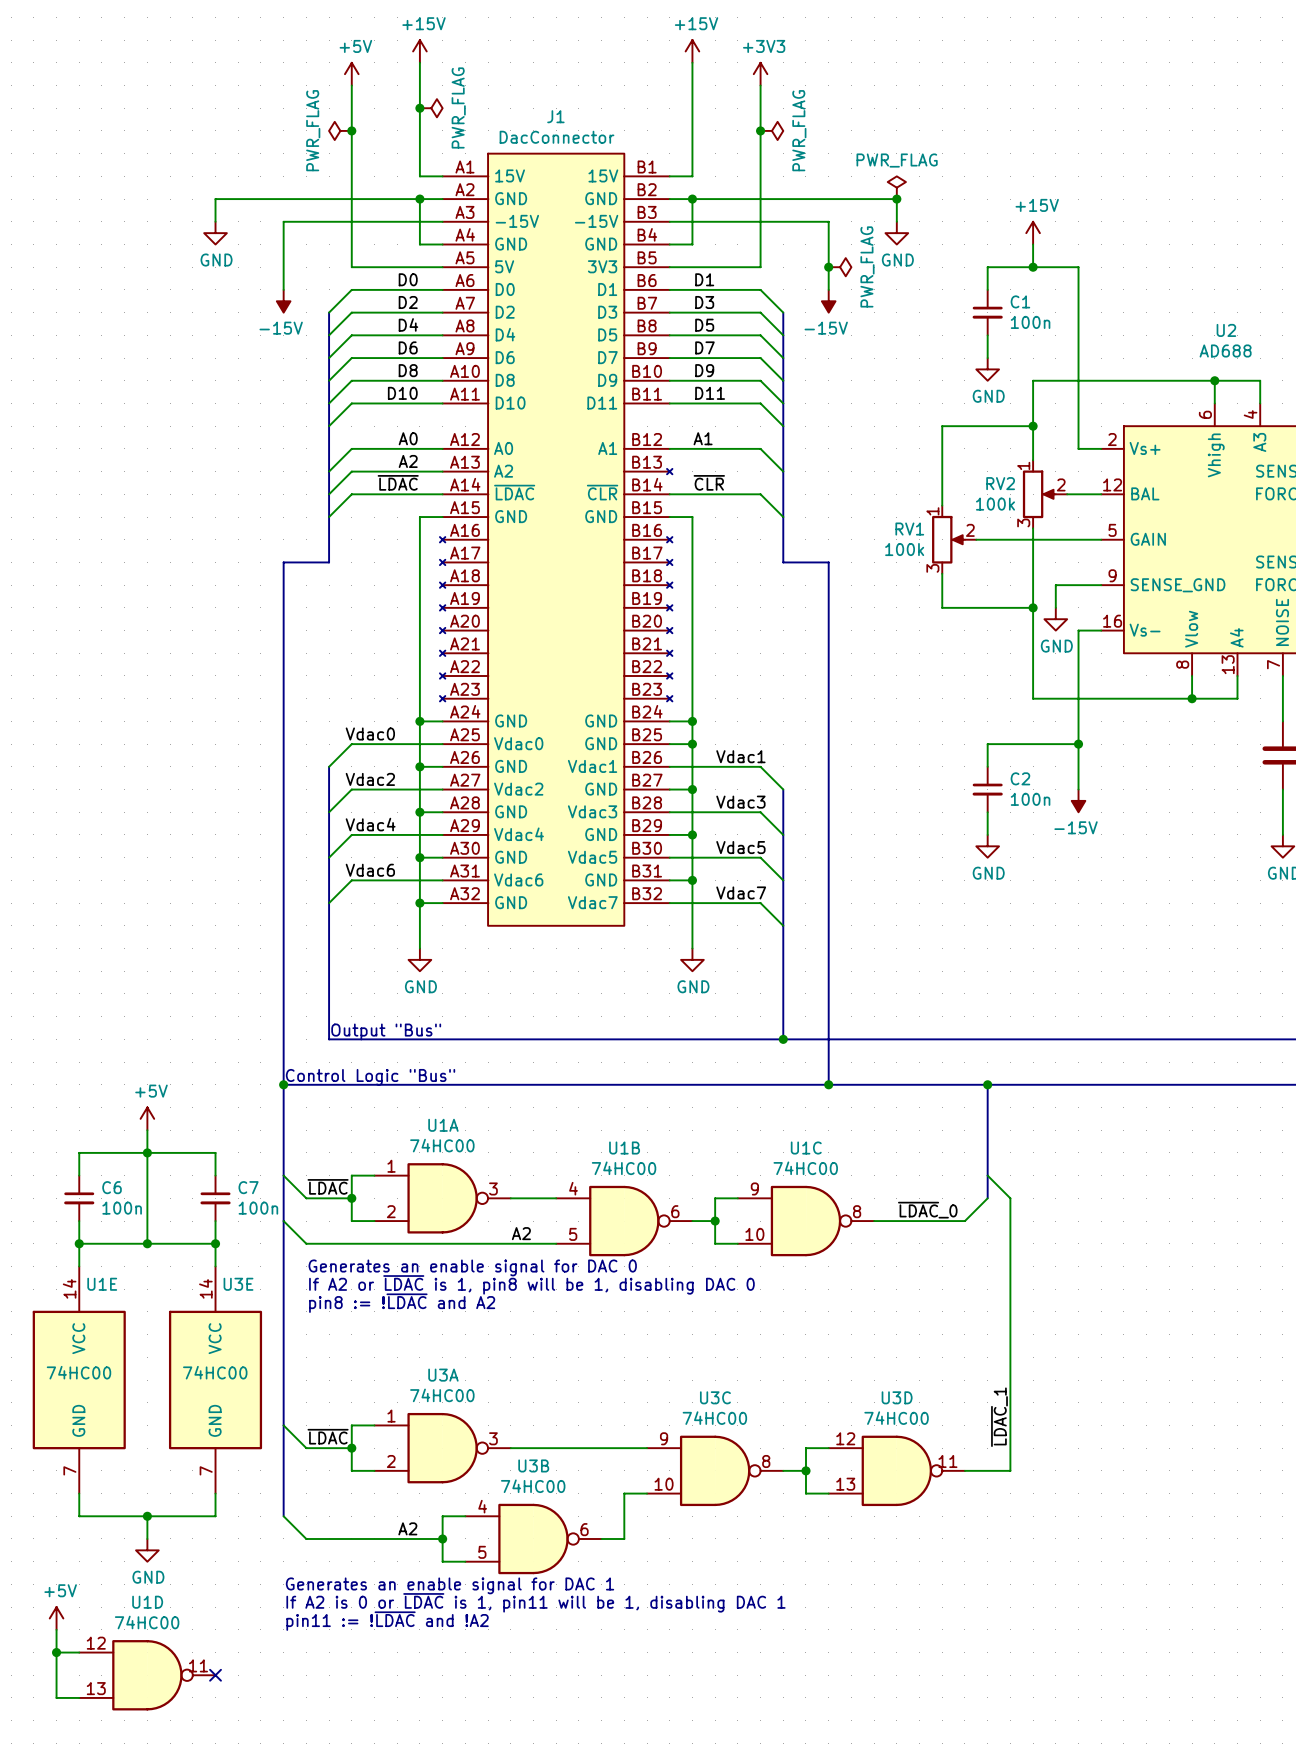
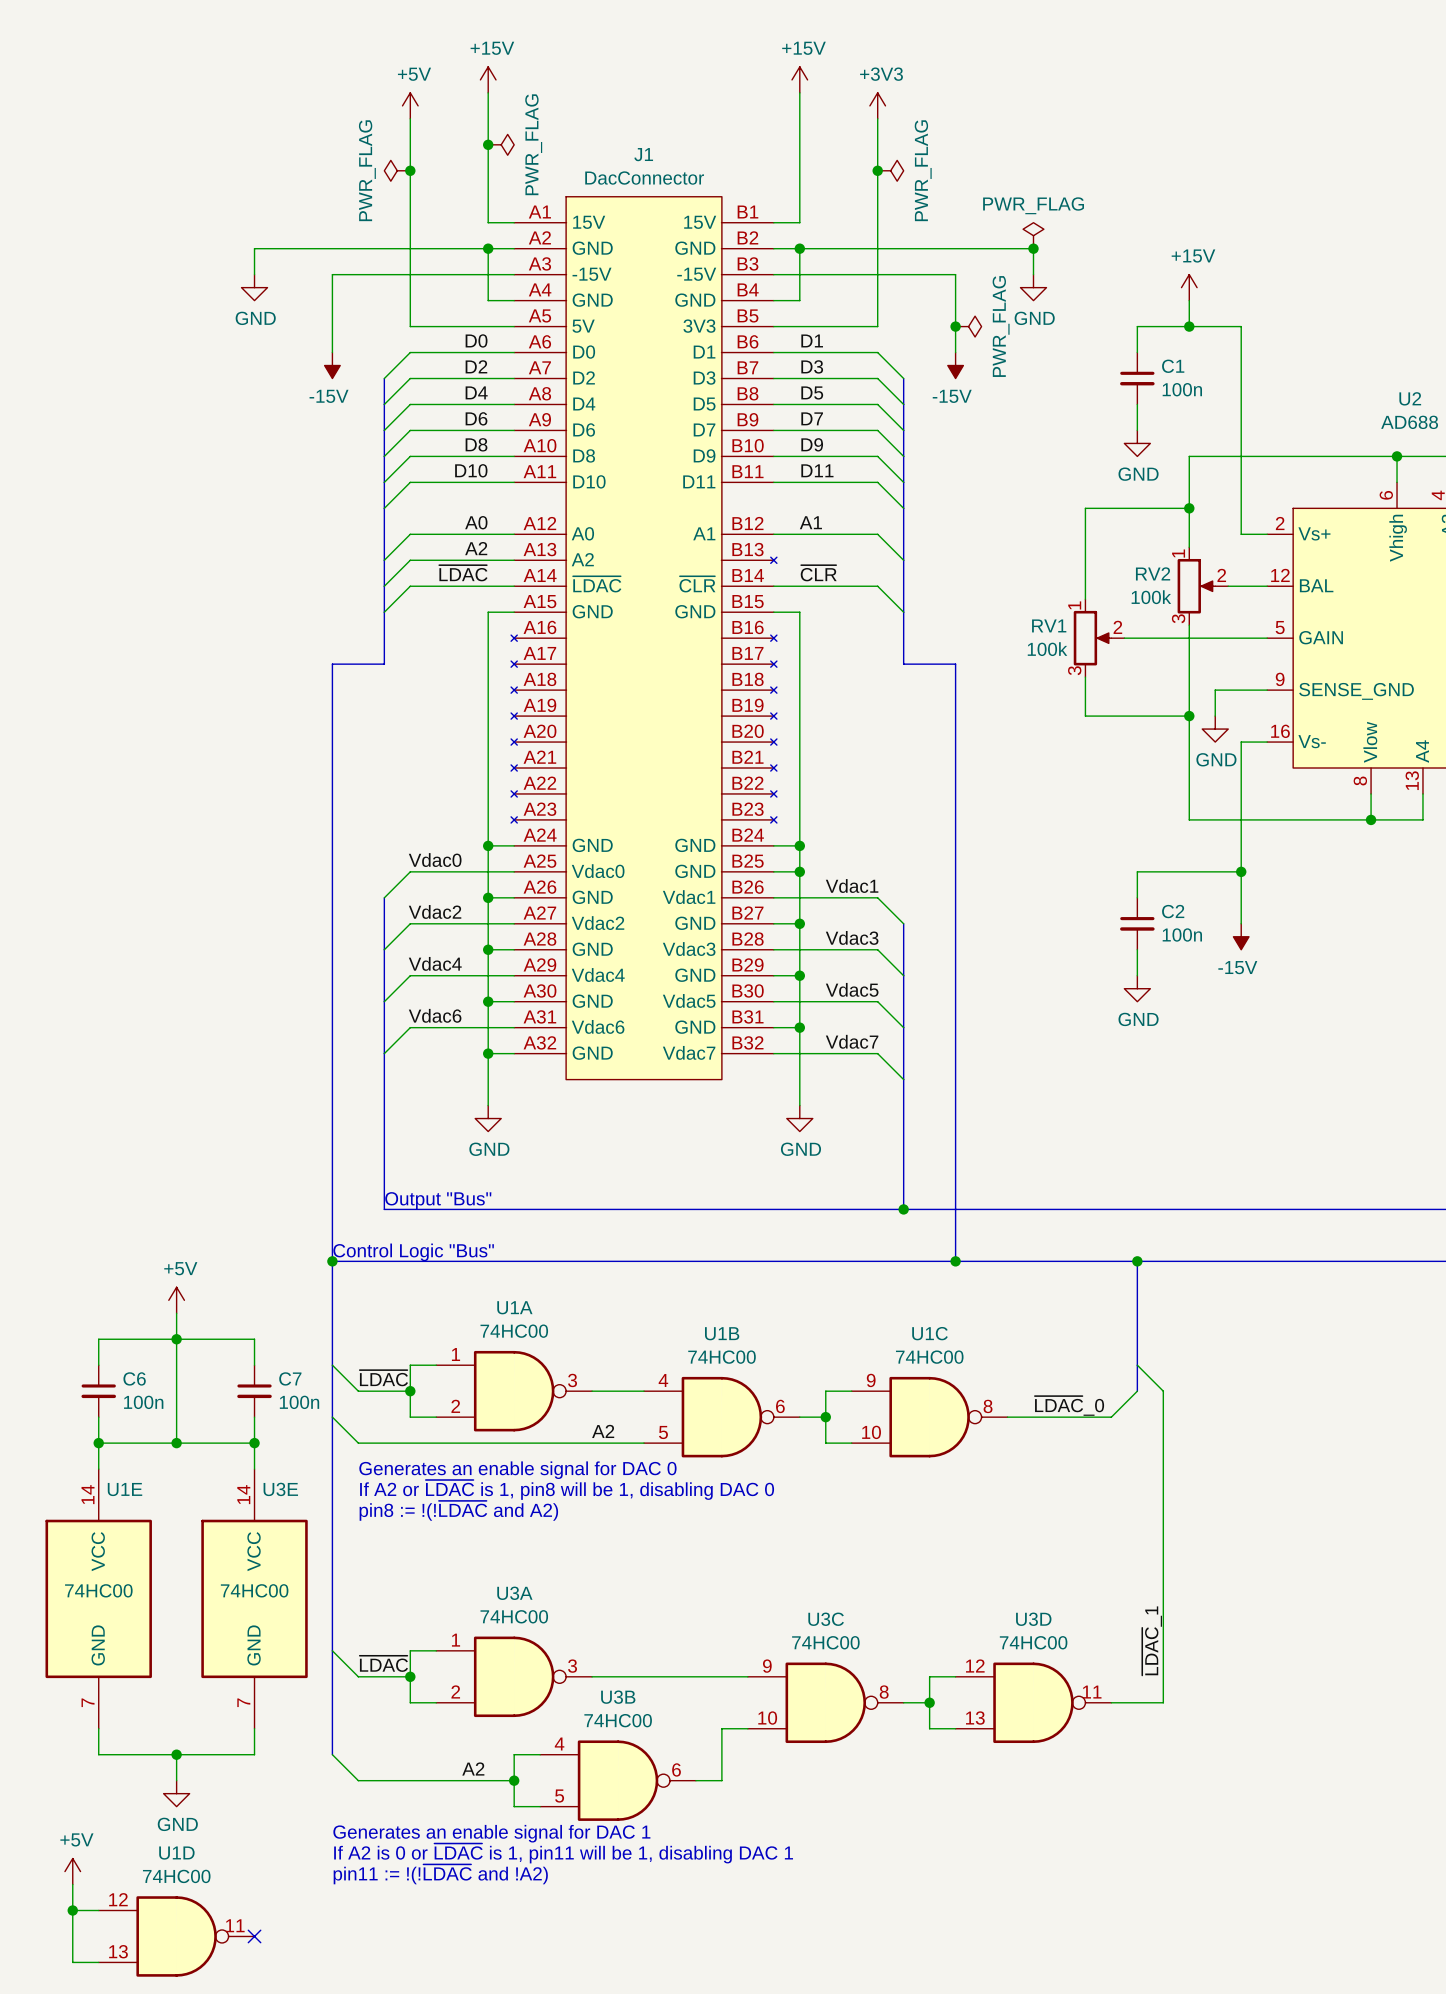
text: pin8 := !~{LDAC} and A2 (402, 1303) -> pin8 := !(!~{LDAC} and A2) (458, 1510)
text: pin11 := !~{LDAC} and !A2 (387, 1621) -> pin11 := !(!~{LDAC} and !A2) (440, 1874)

